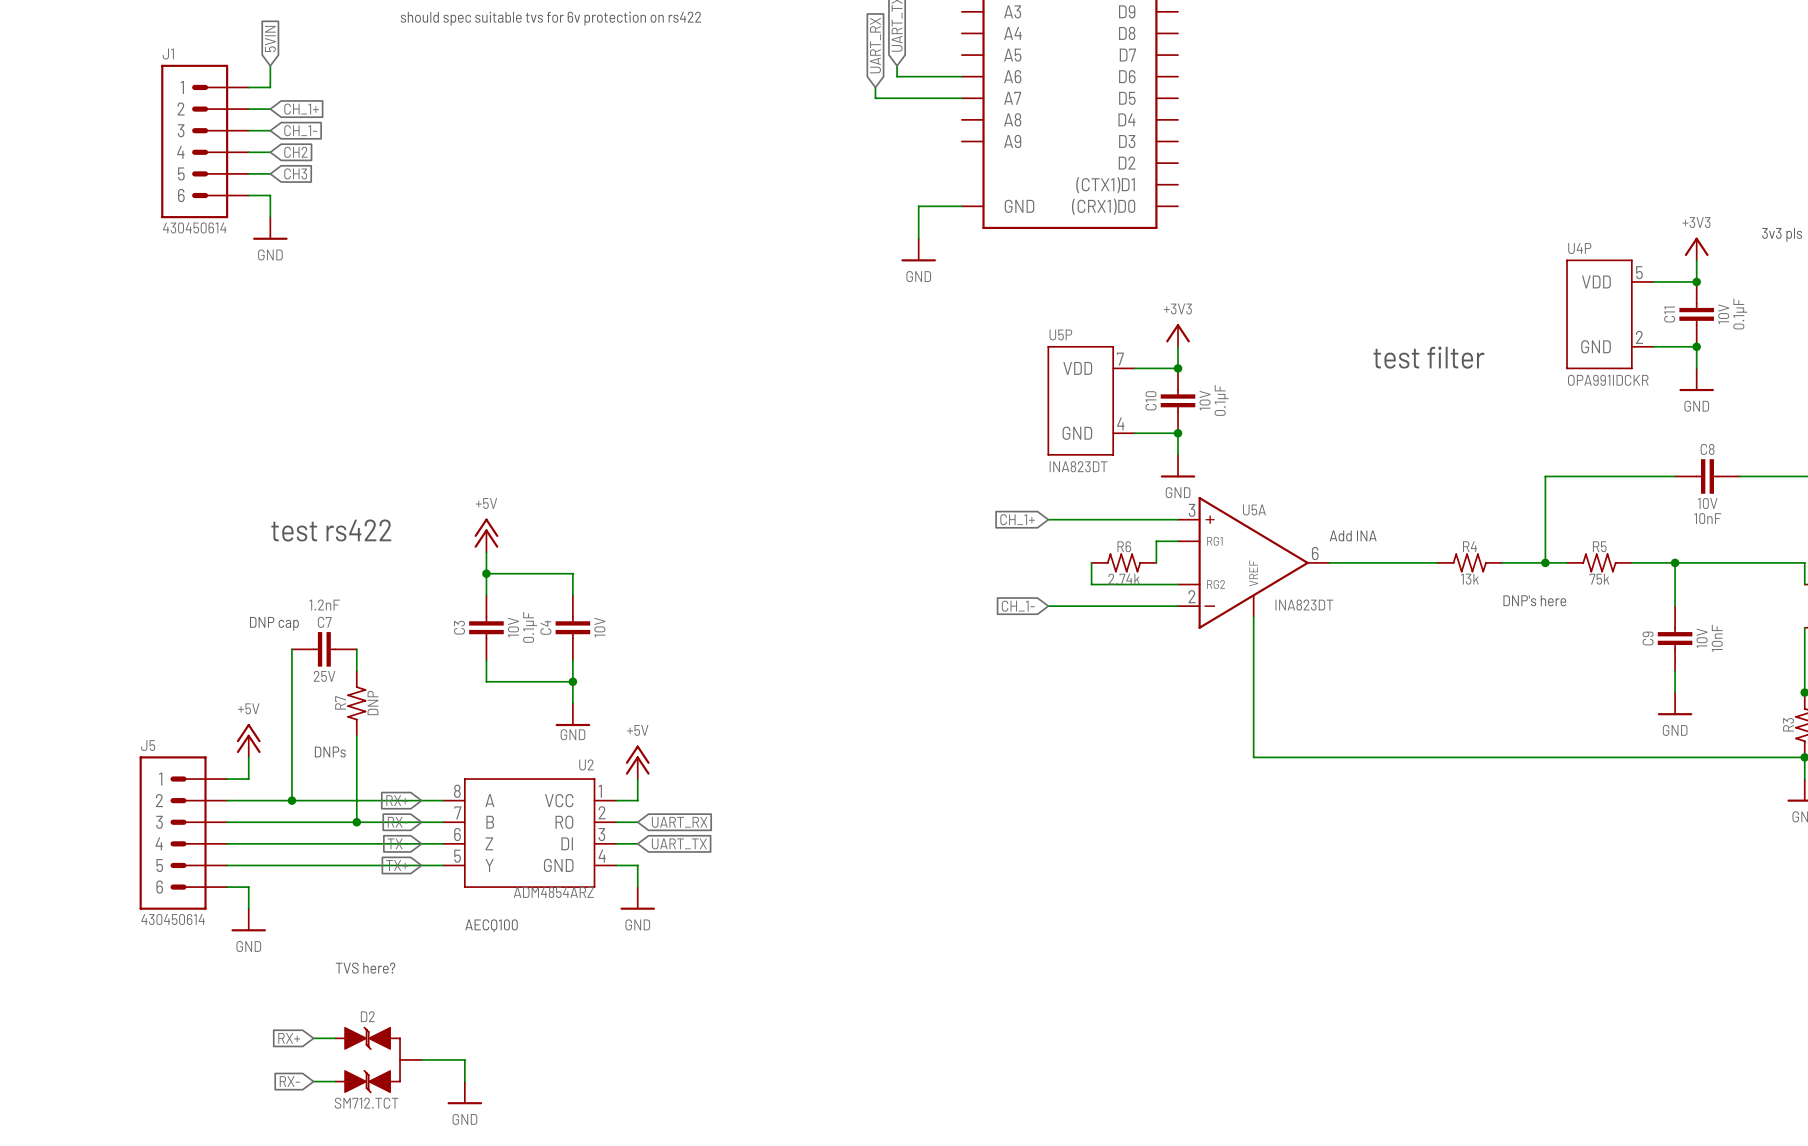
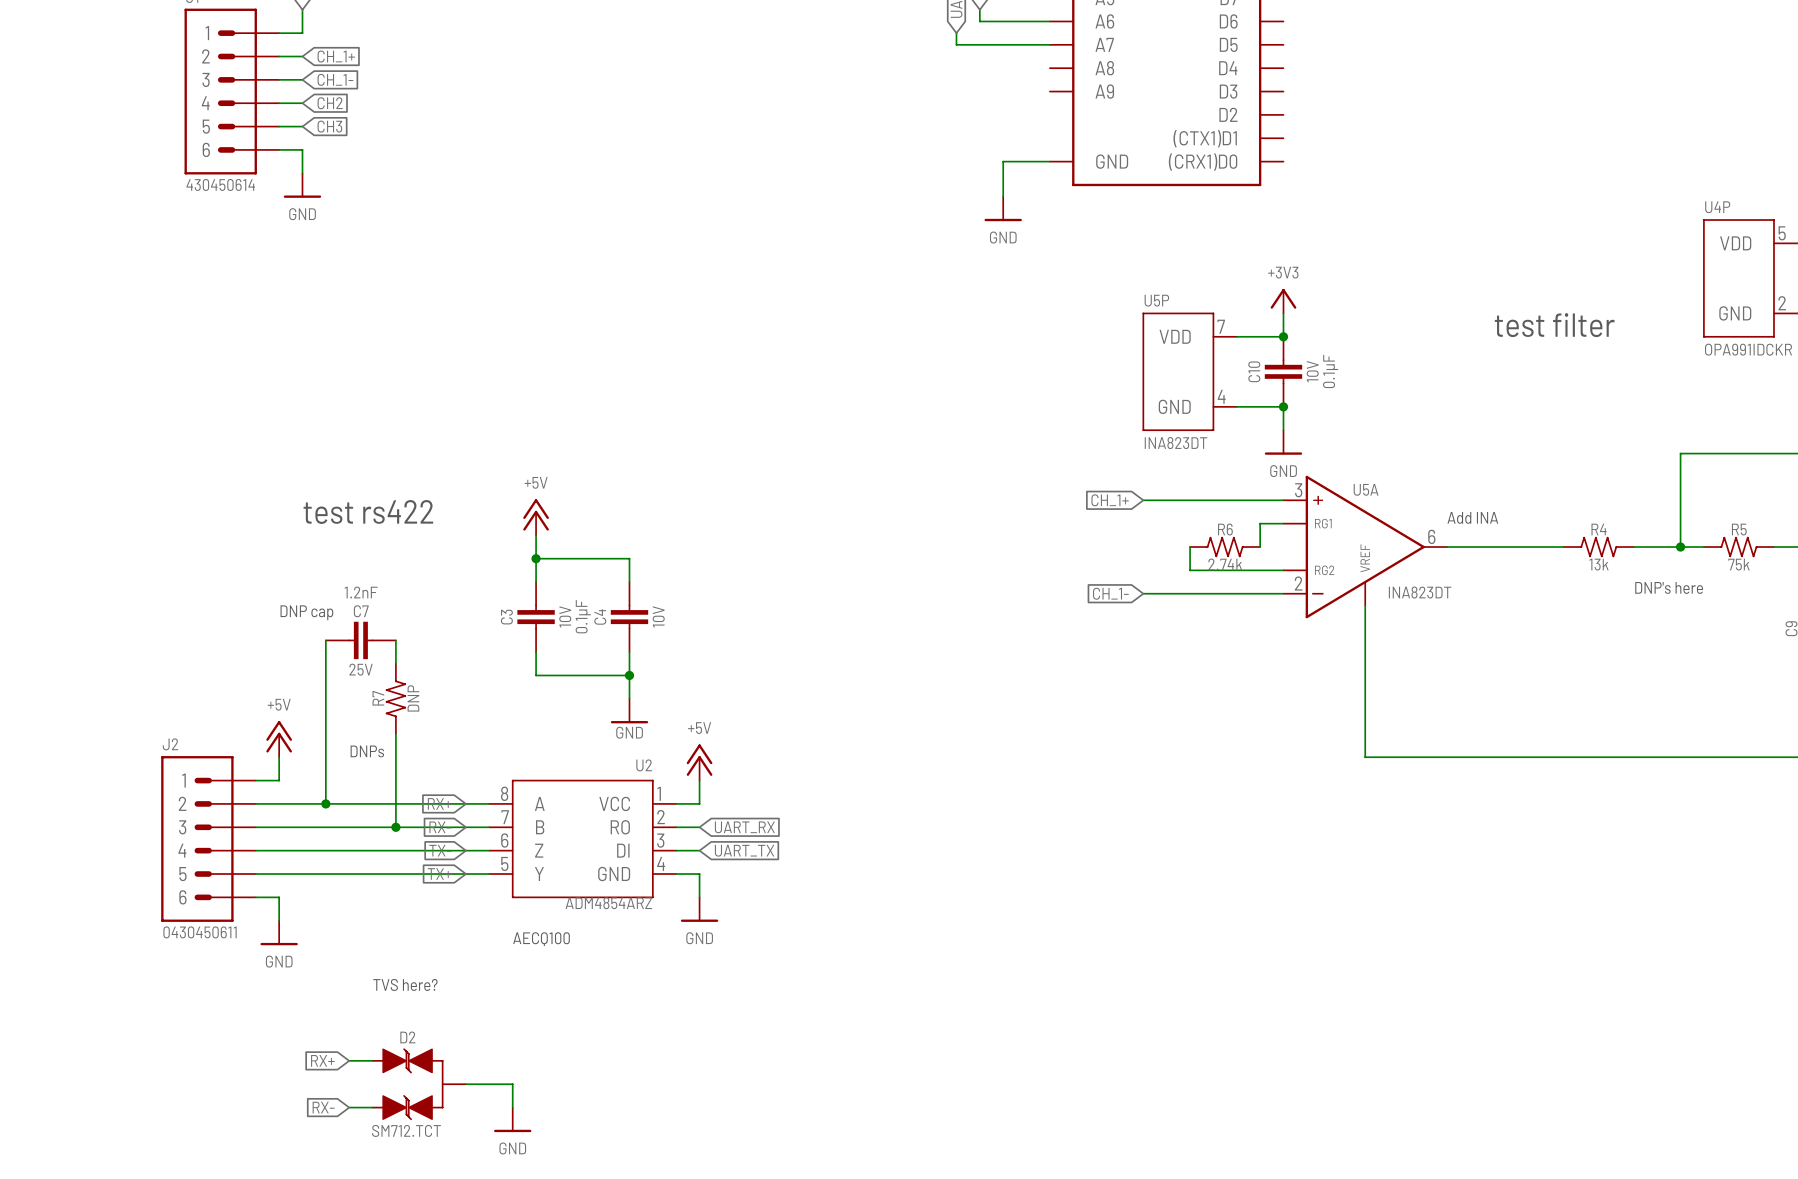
J5 name: J5 (148, 745) -> J2 (170, 744)
J5 text: 430450614 (173, 919) -> 0430450611 (200, 932)

